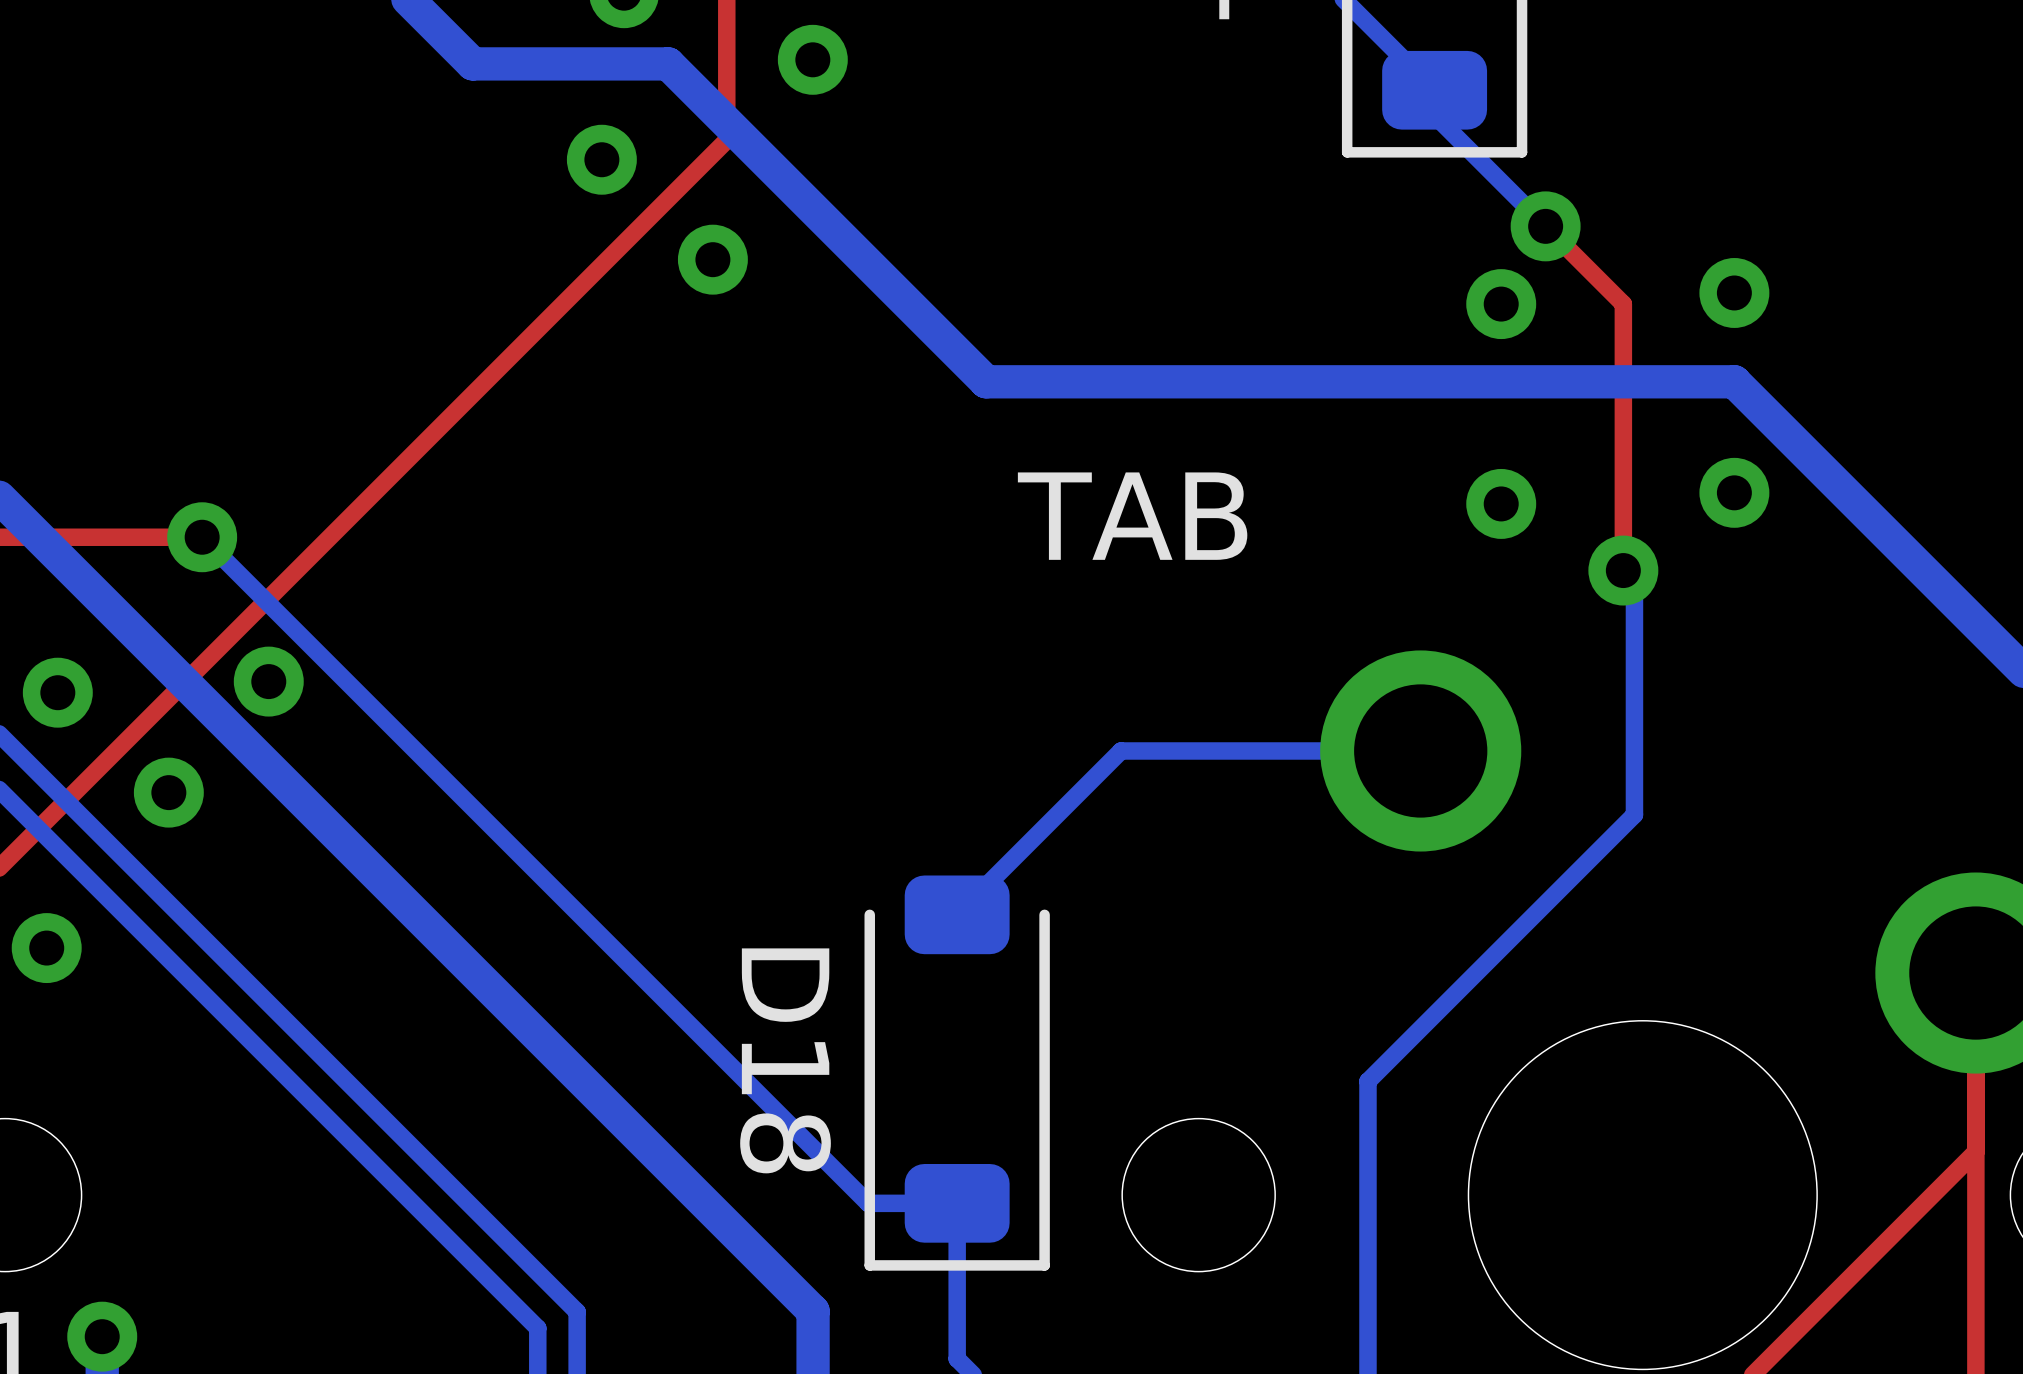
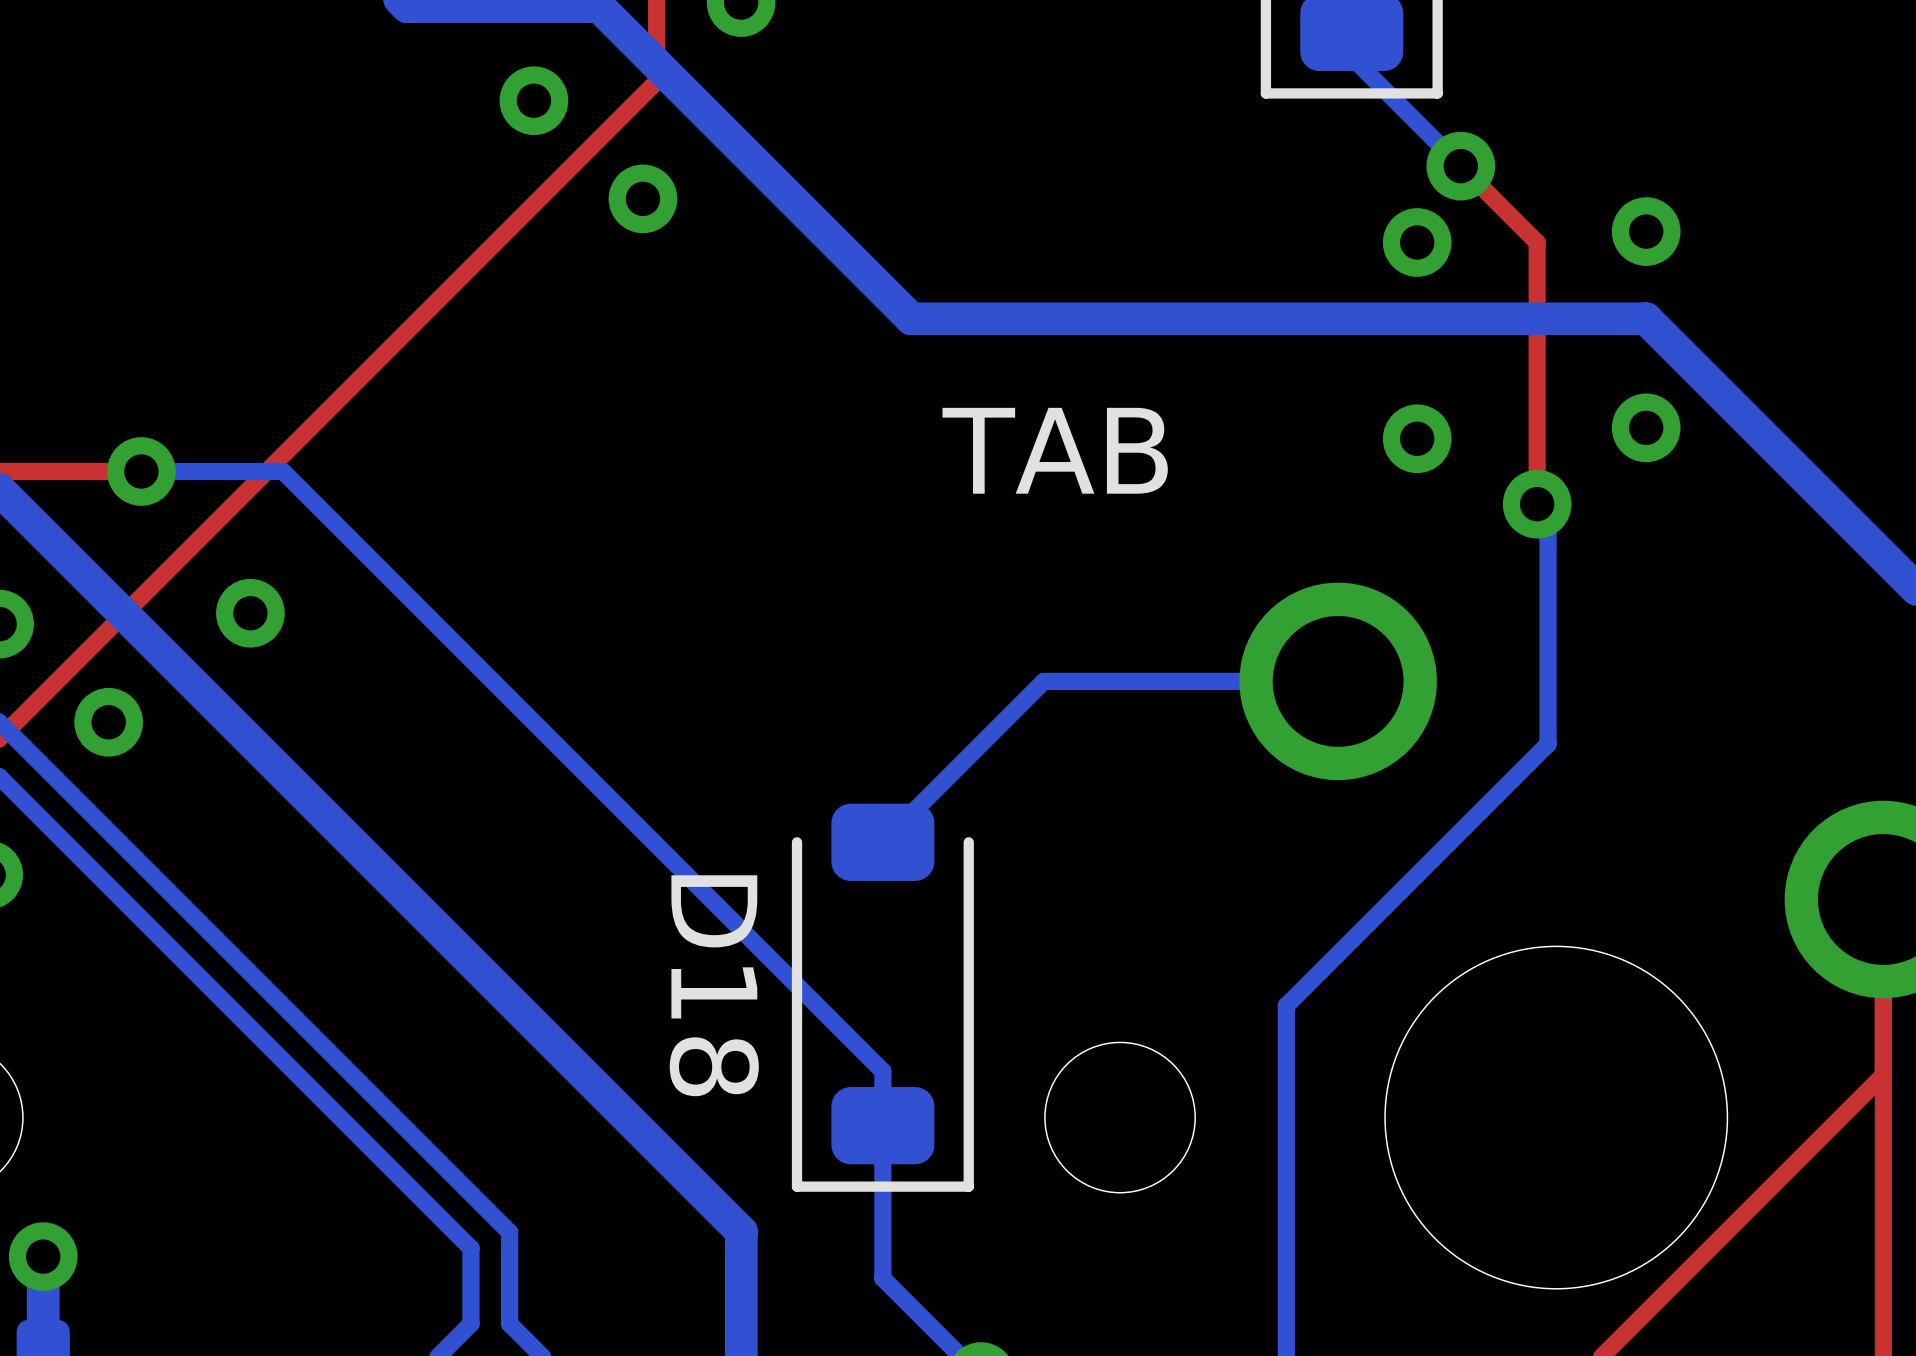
bottom track: (202, 537) (868, 1203) (957, 1203) -> (141, 471) (283, 471) (882, 1071) (882, 1125)
via position: (268, 681) -> (250, 613)

